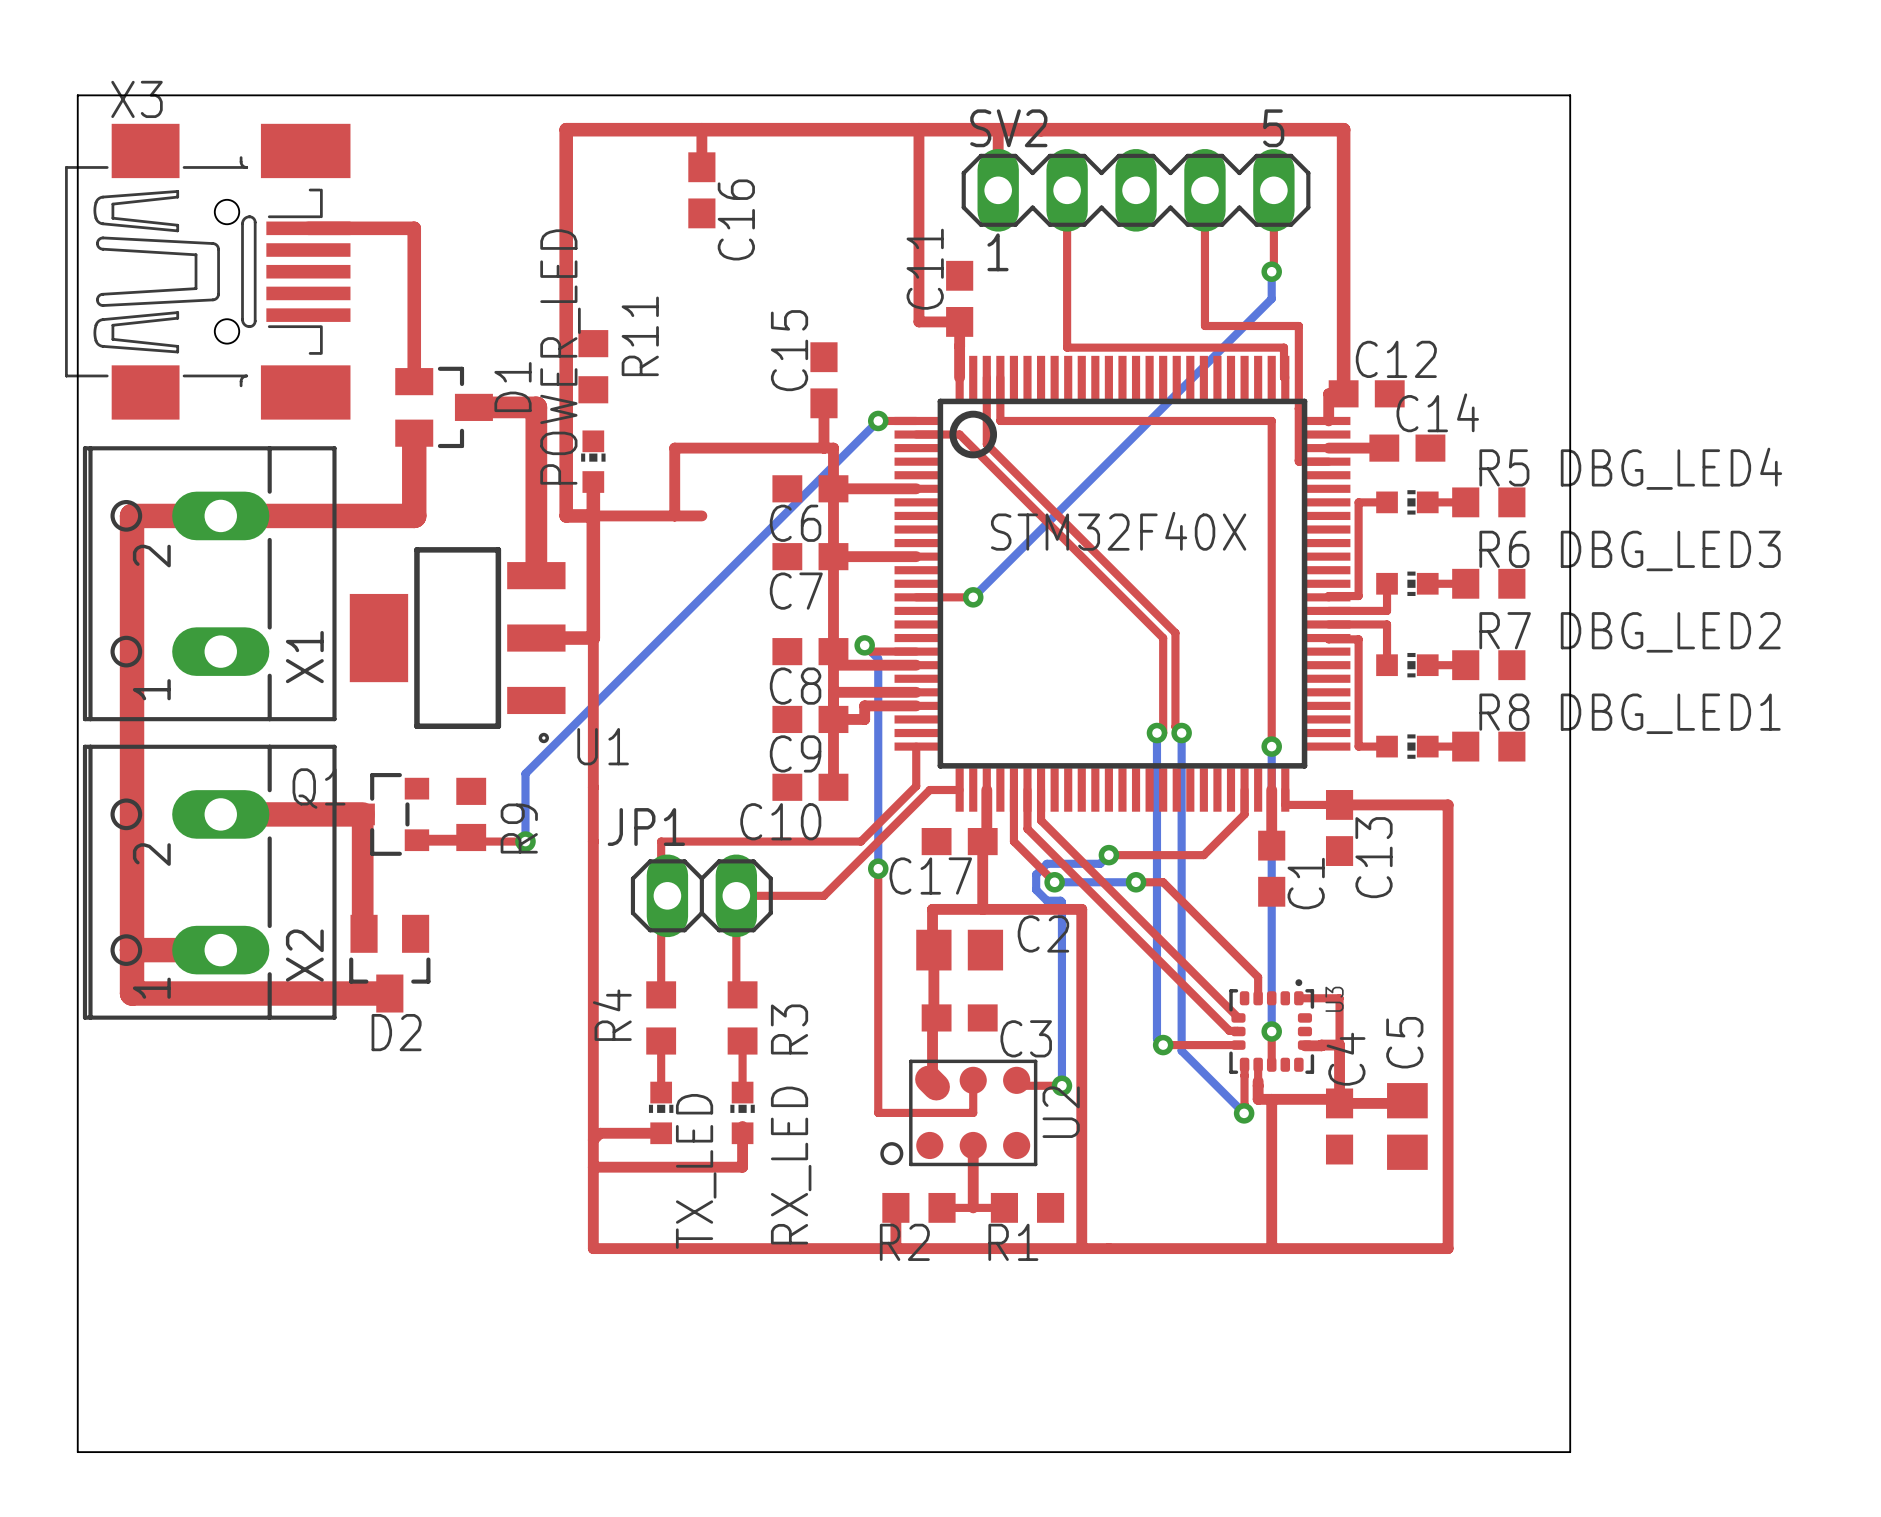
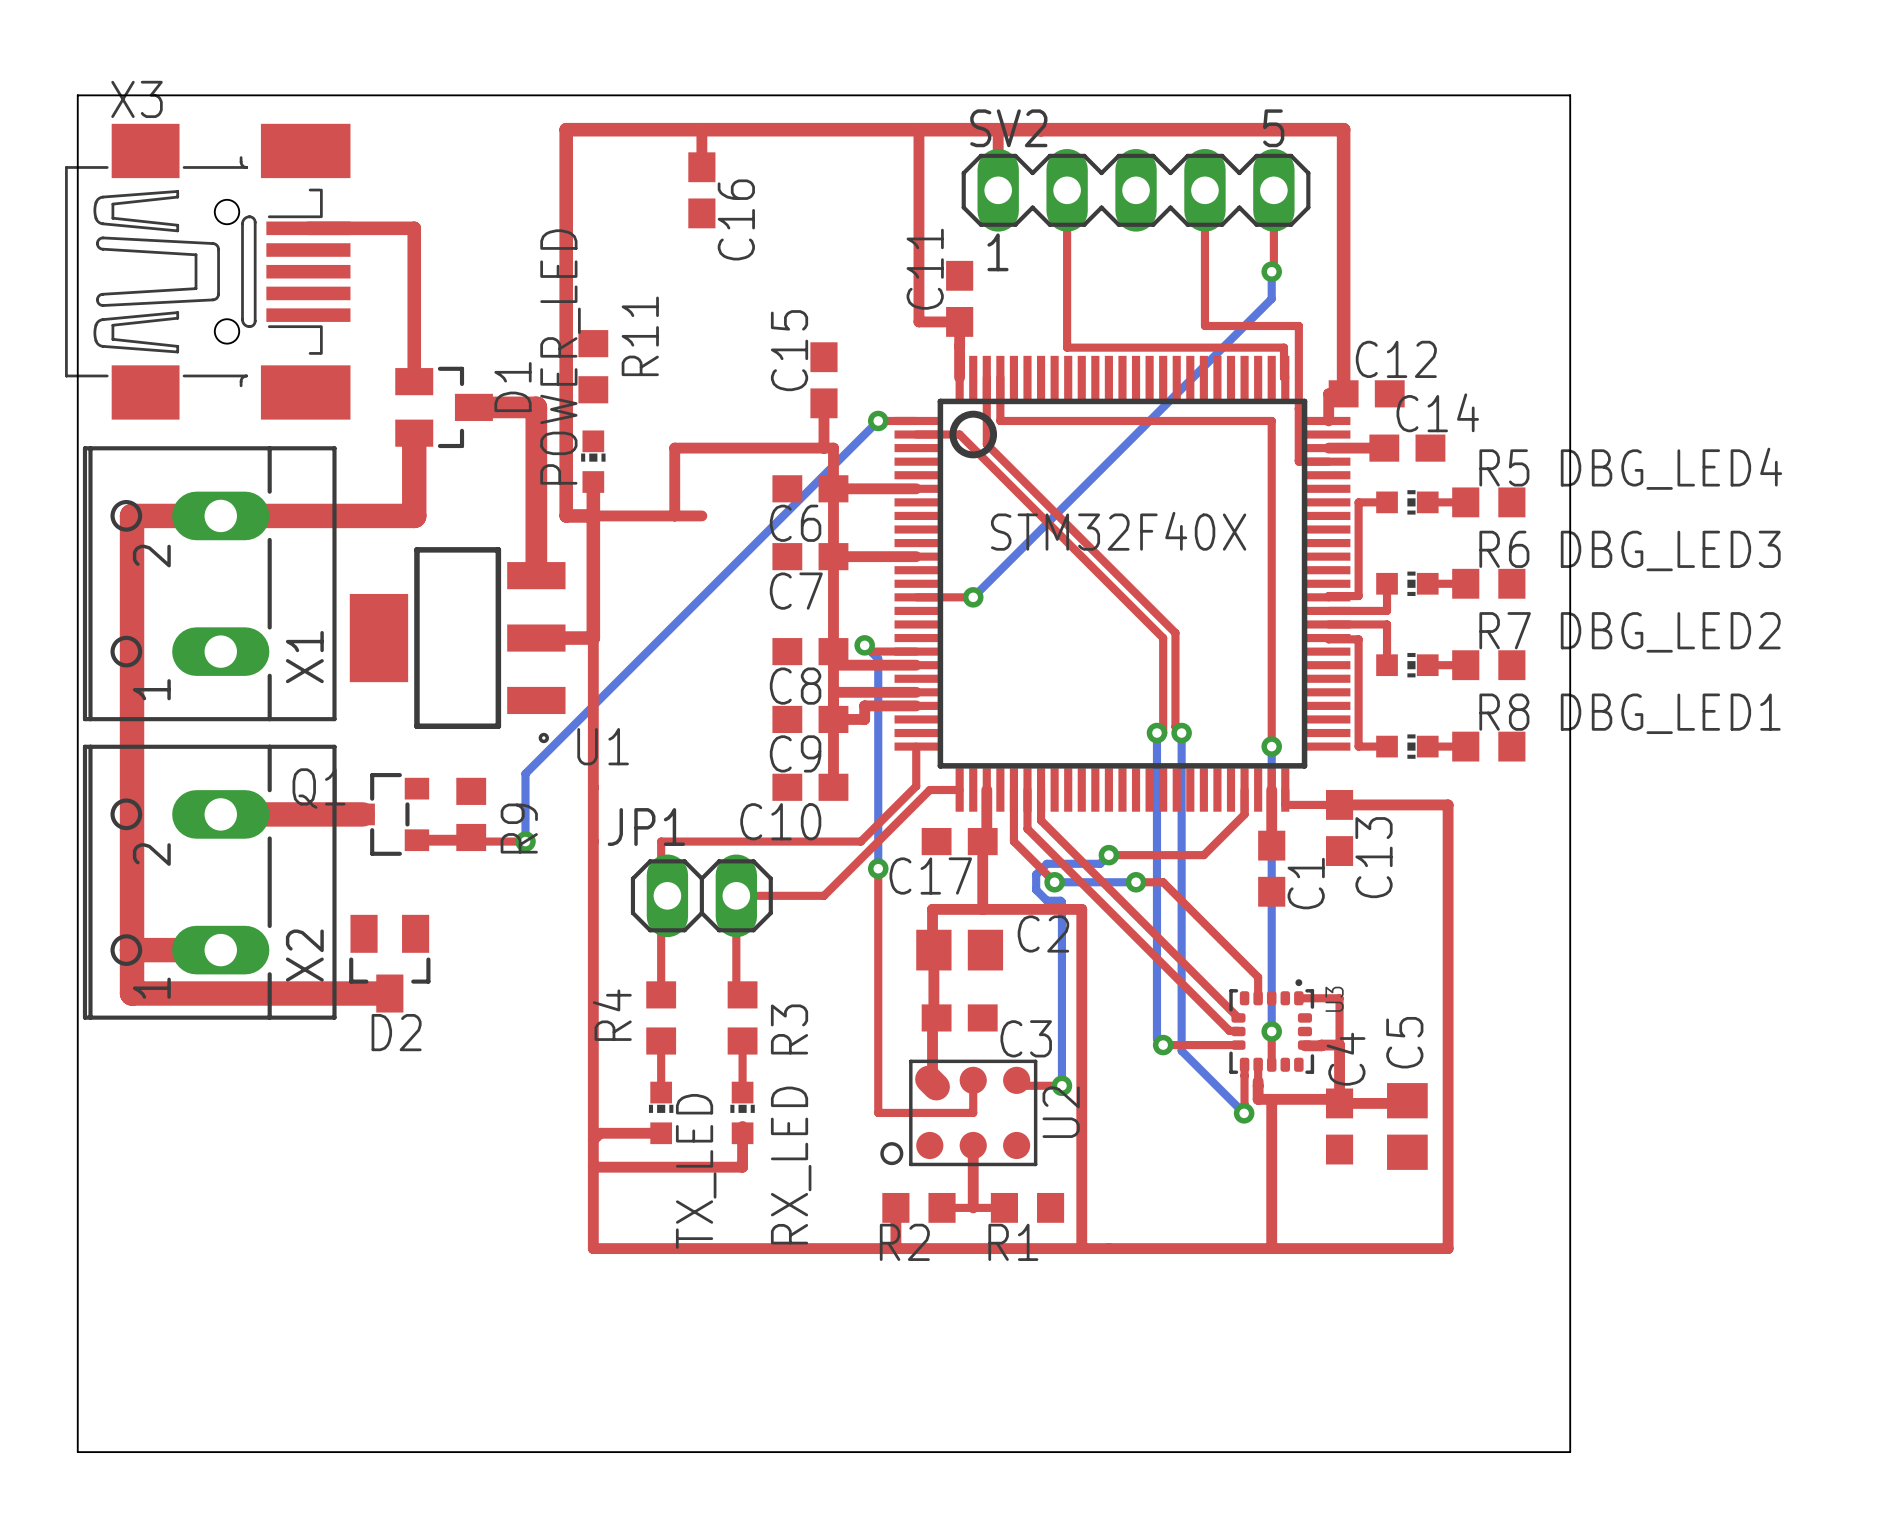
top track: (362, 814) (364, 933) -> none

